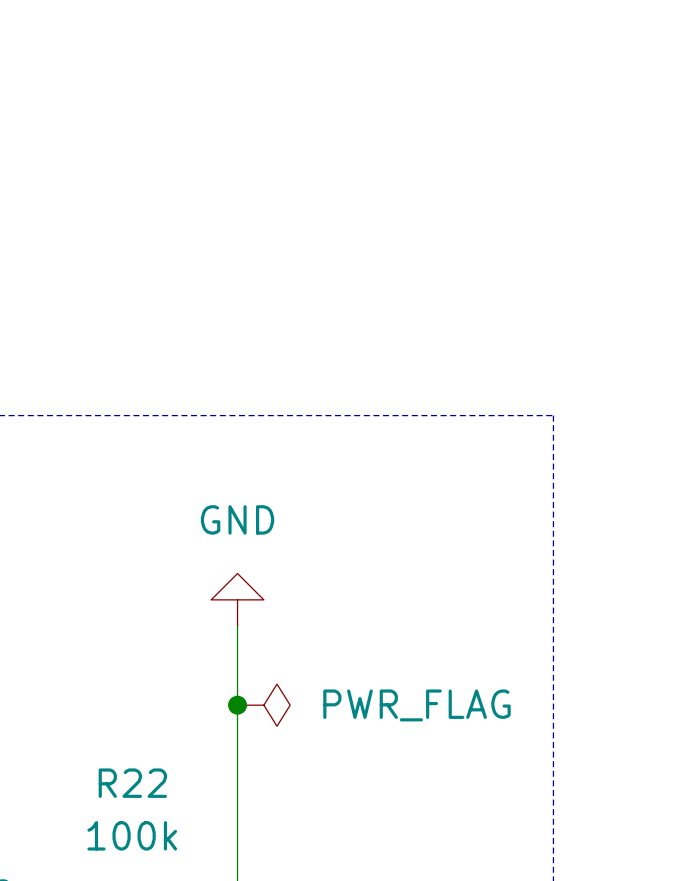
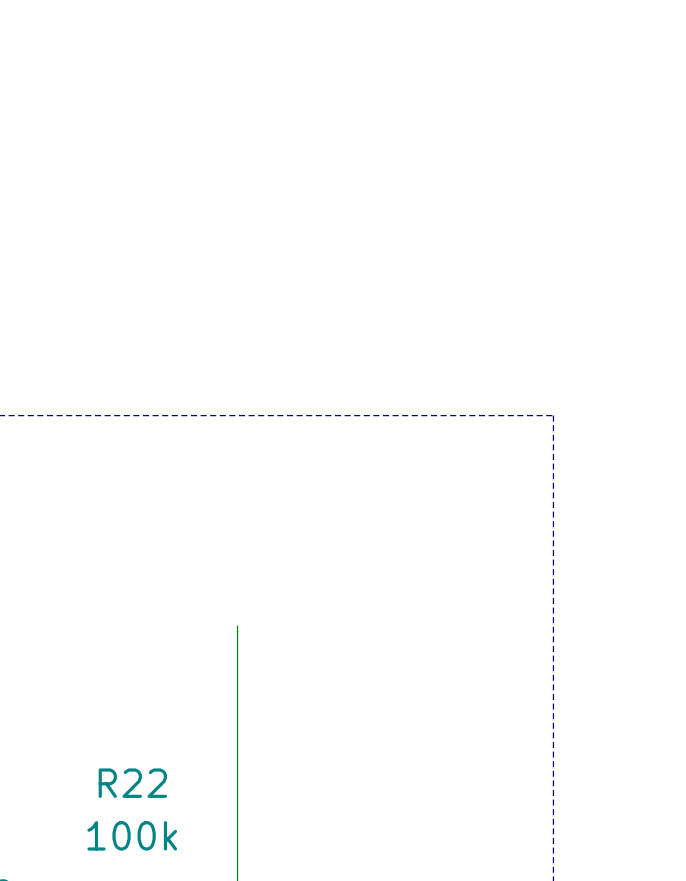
power symbol: GND (237, 599) -> none
junction: (237, 705) -> none
power symbol: PWR_FLAG (263, 705) -> none

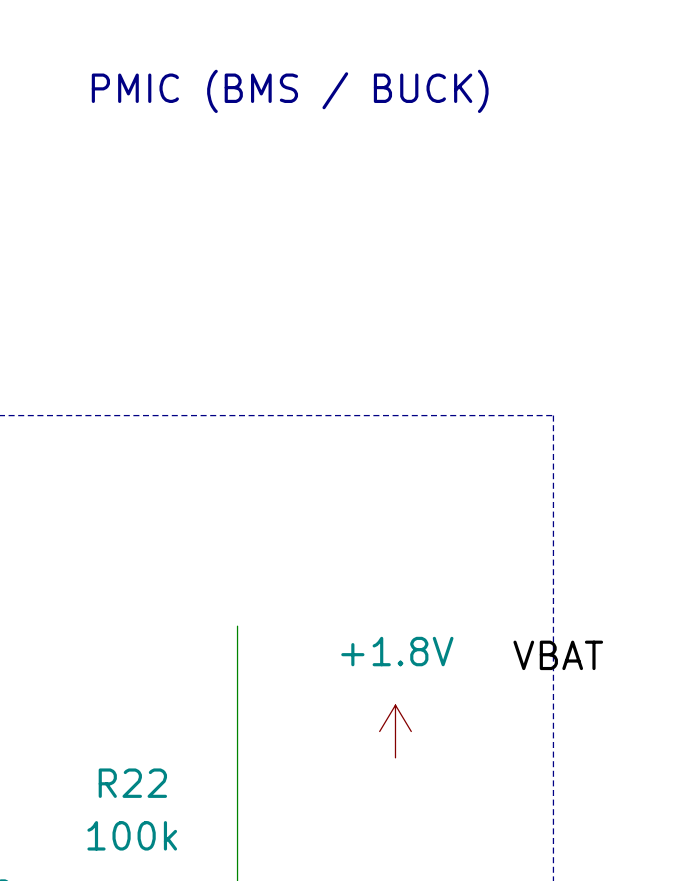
text: none -> PMIC (BMS / BUCK) (290, 91)
label: none -> VBAT (558, 655)
power symbol: none -> +1.8V (395, 731)

